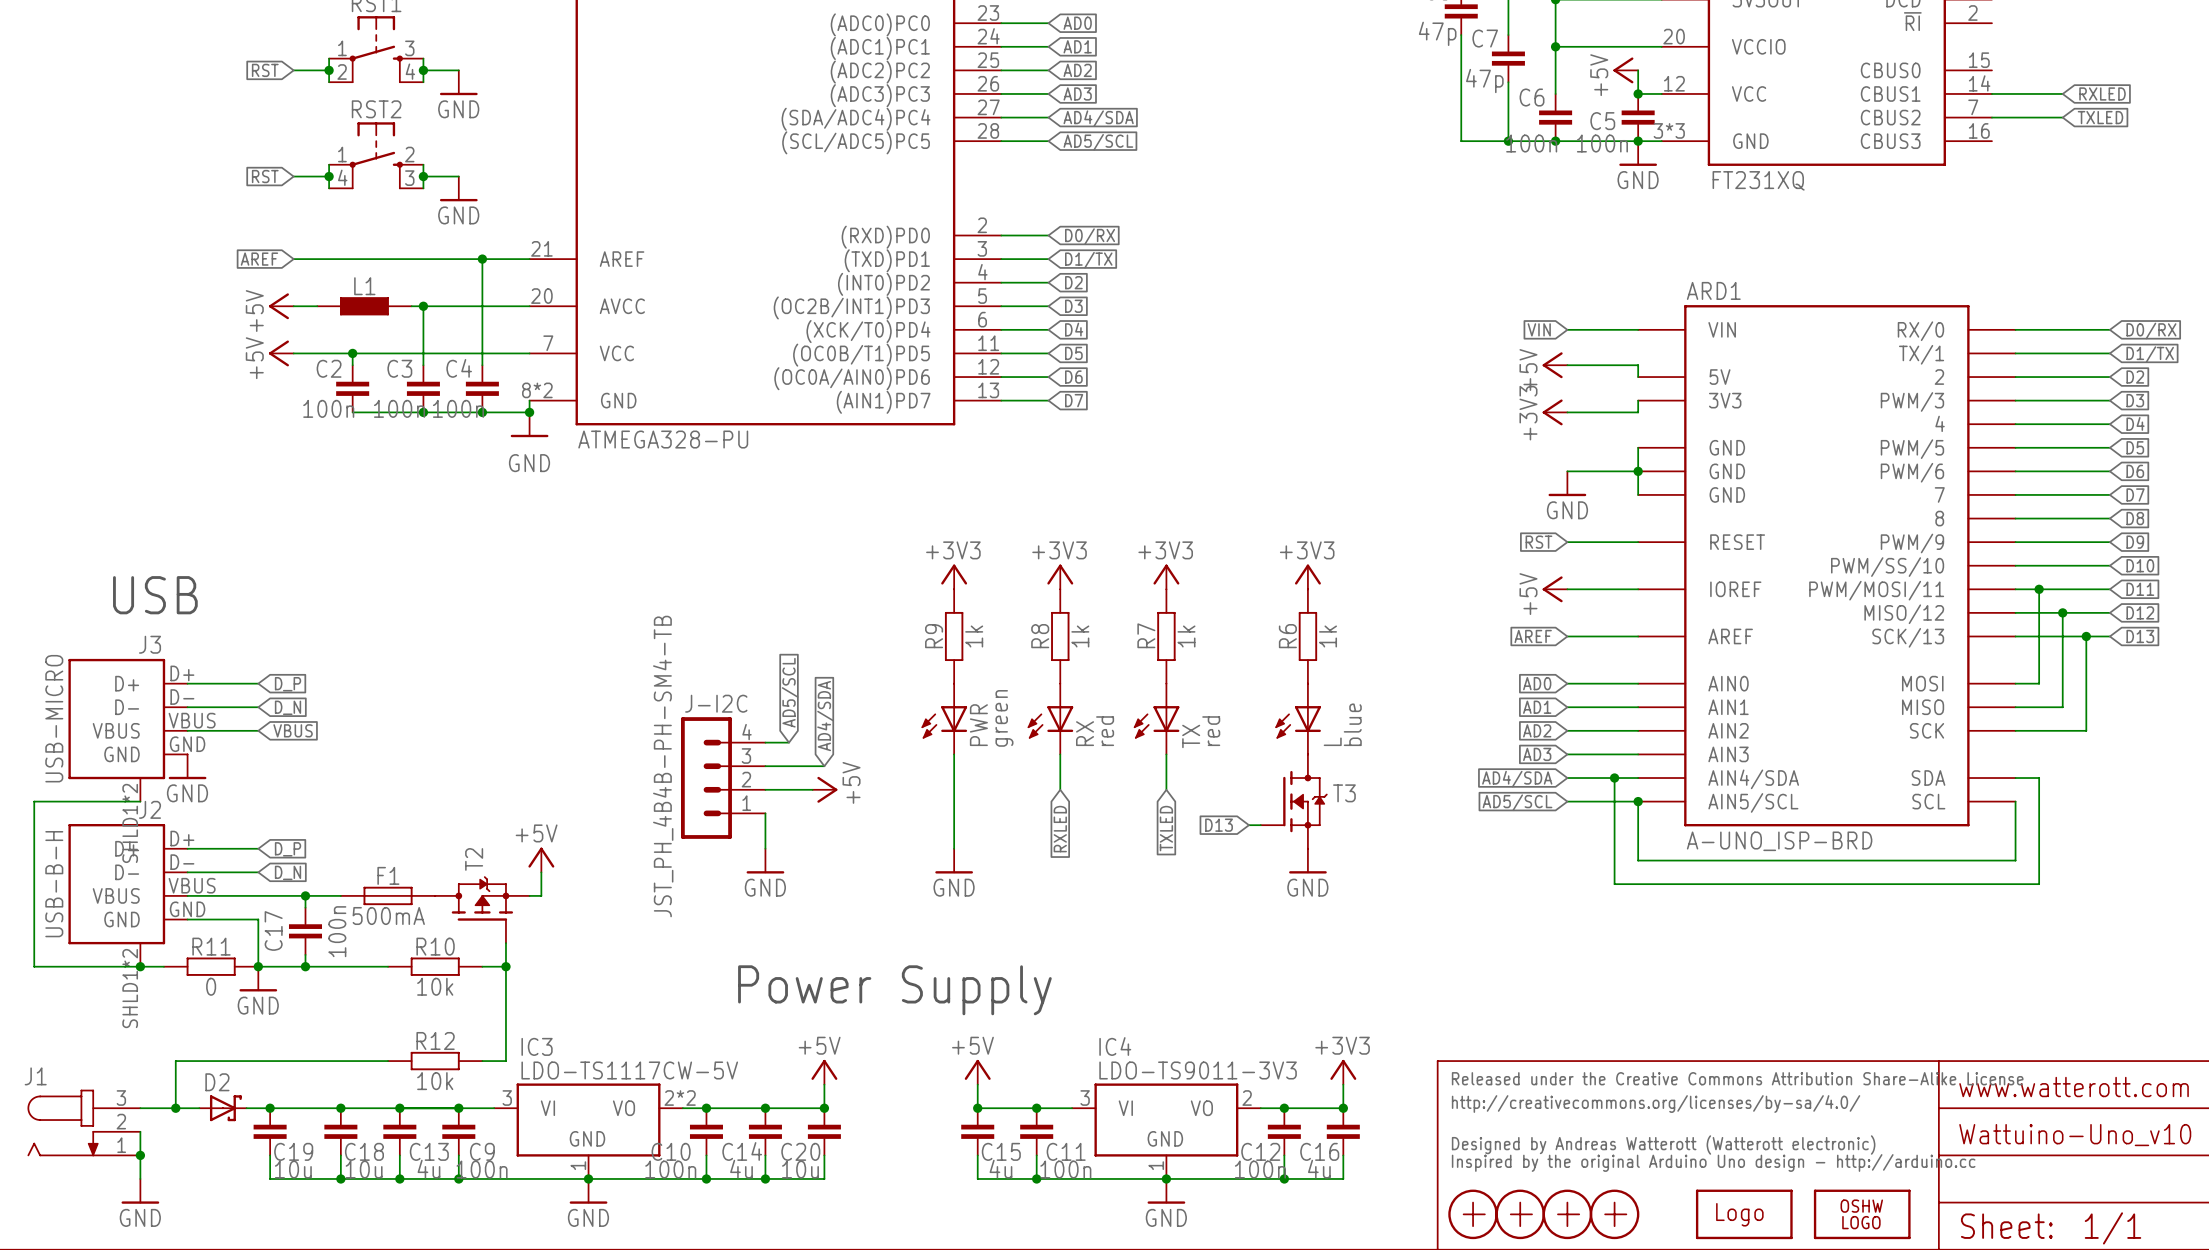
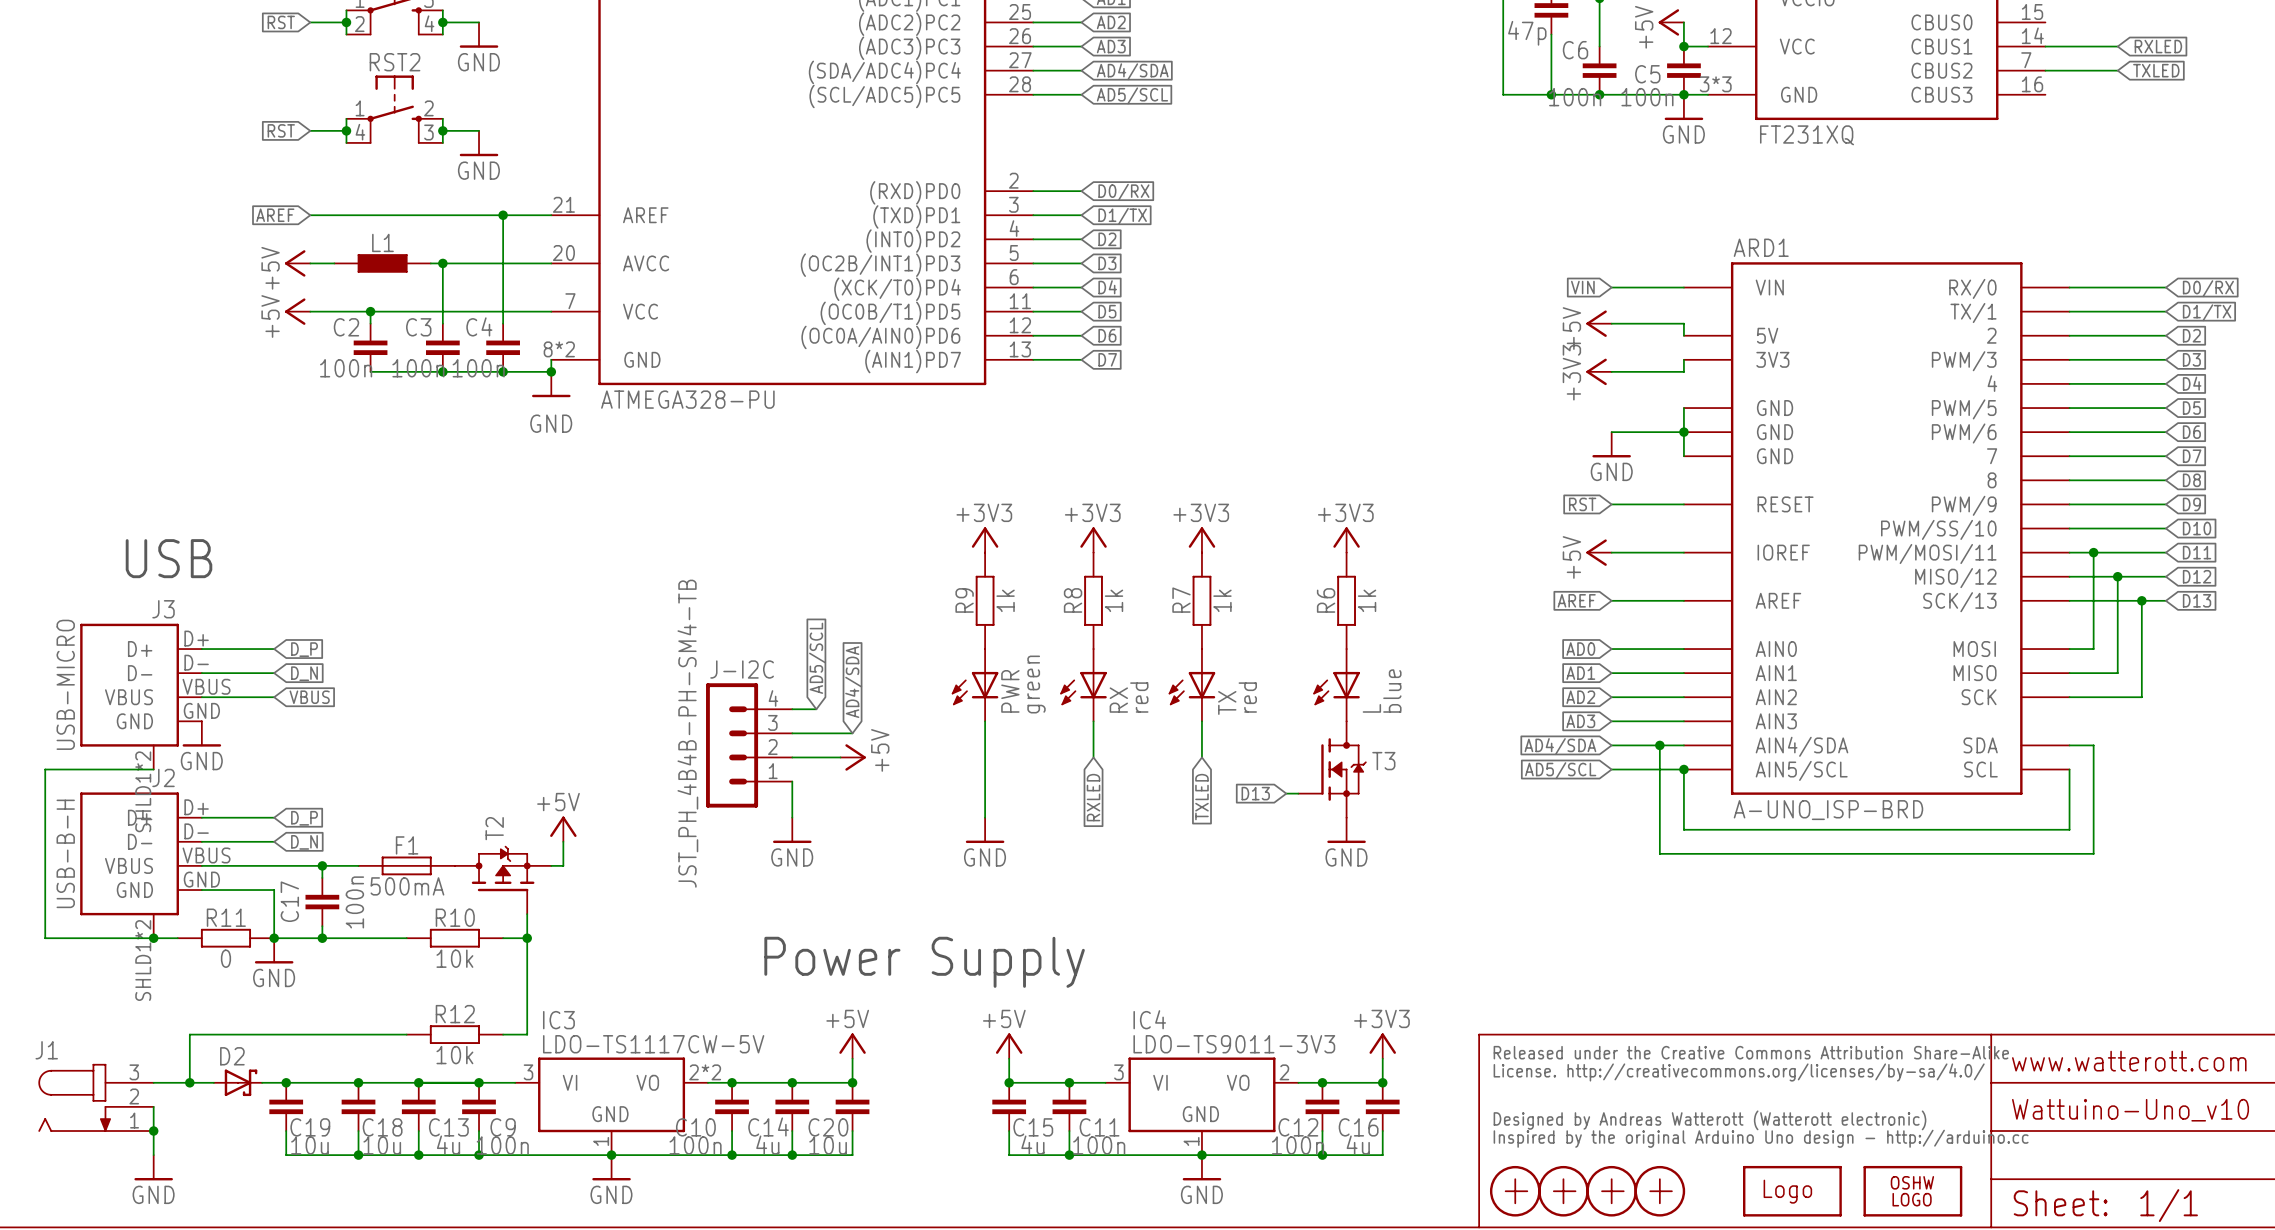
text: Released under the Creative Commons Attribution Share-Alike License (1737, 1078) -> License. http://creativecommons.org/licenses/by-sa/4.0/ (1739, 1072)
text: http://creativecommons.org/licenses/by-sa/4.0/ (1656, 1104) -> none

